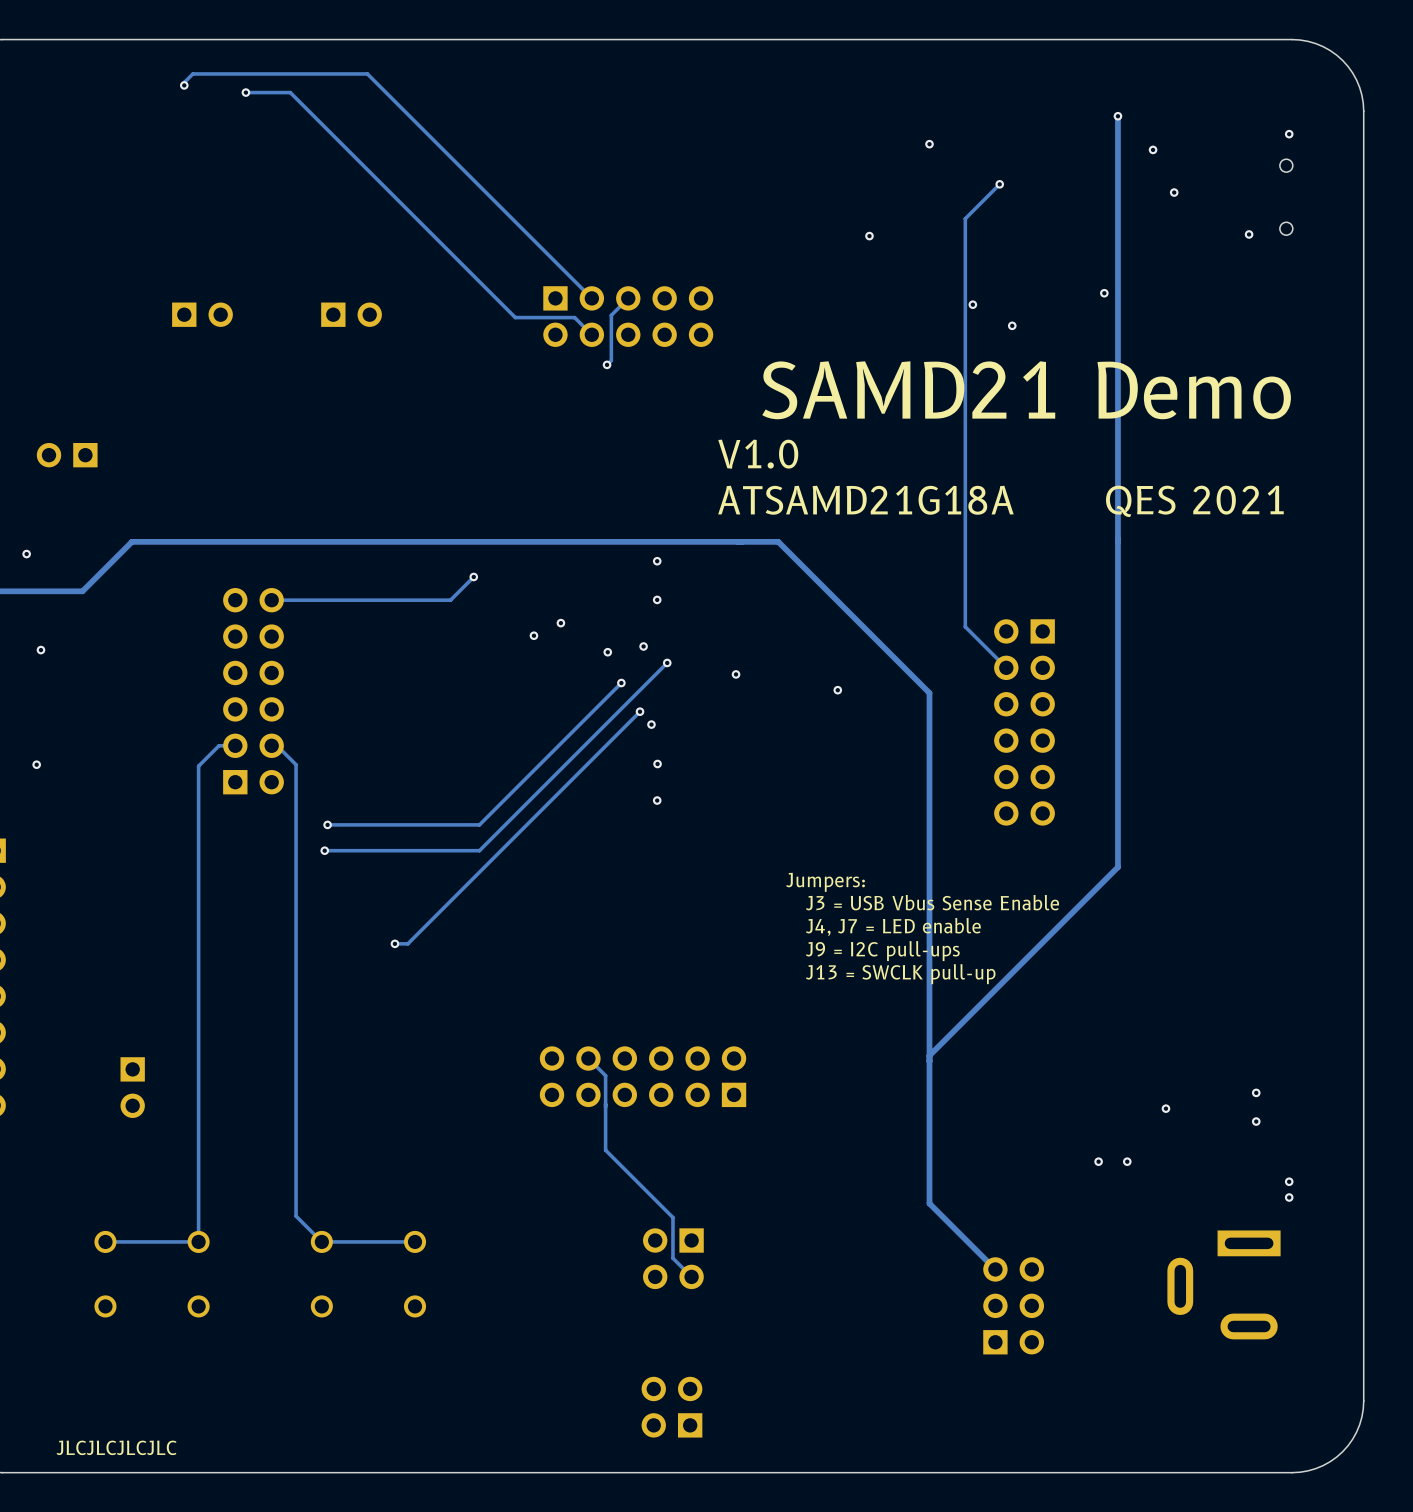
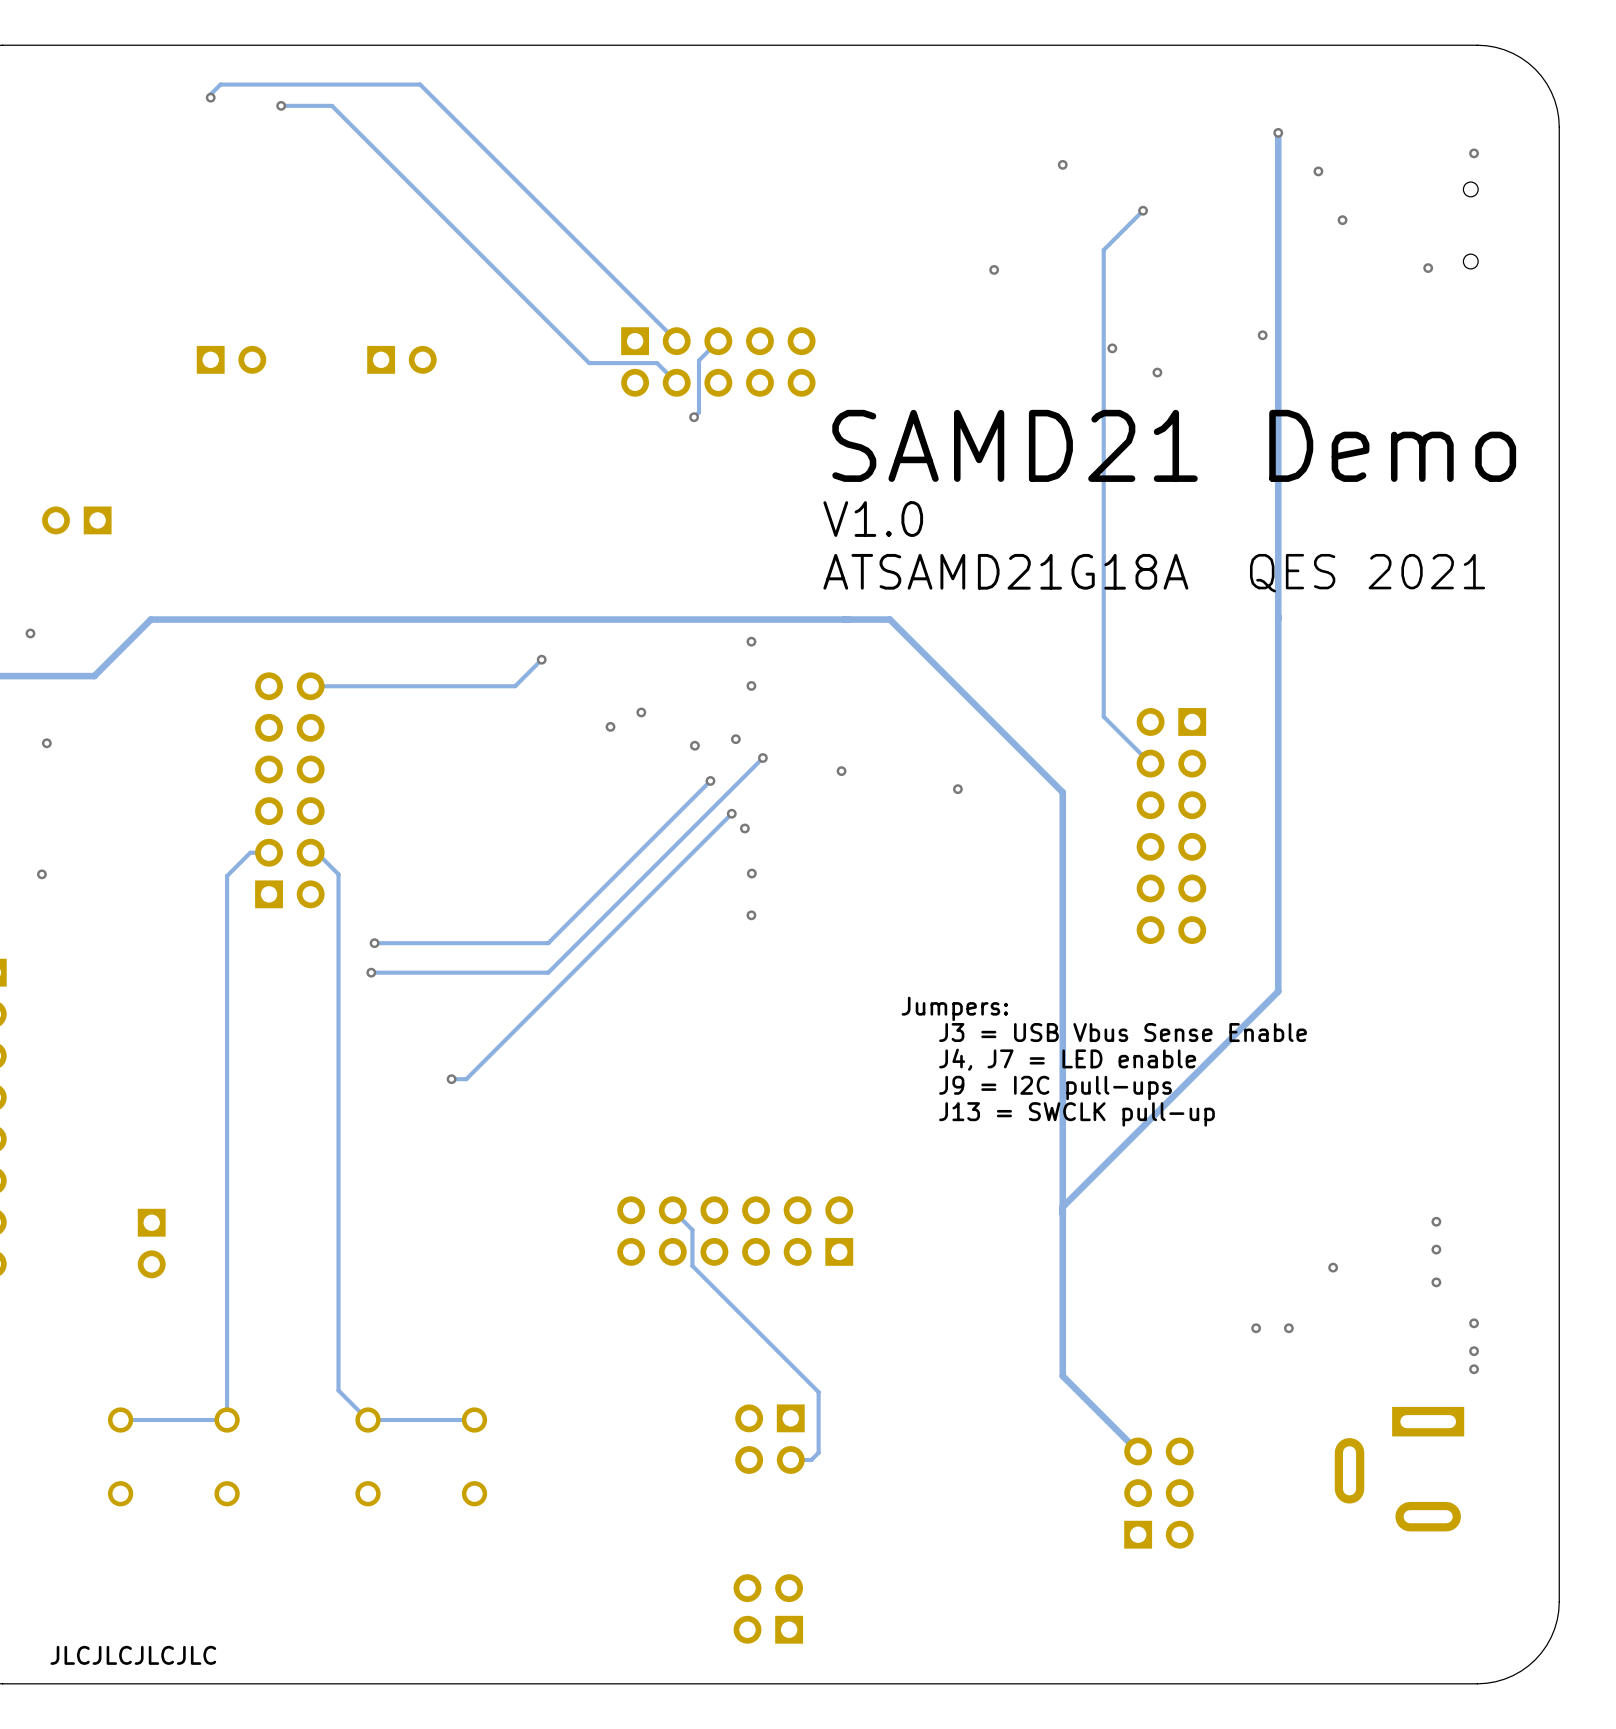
via: none -> (1436, 1221)
track: (605, 1107) (605, 1150) (672, 1217) (672, 1258) (691, 1276) -> (692, 1265) (818, 1392) (818, 1452) (811, 1459) (790, 1459)
via: none -> (1474, 1323)

